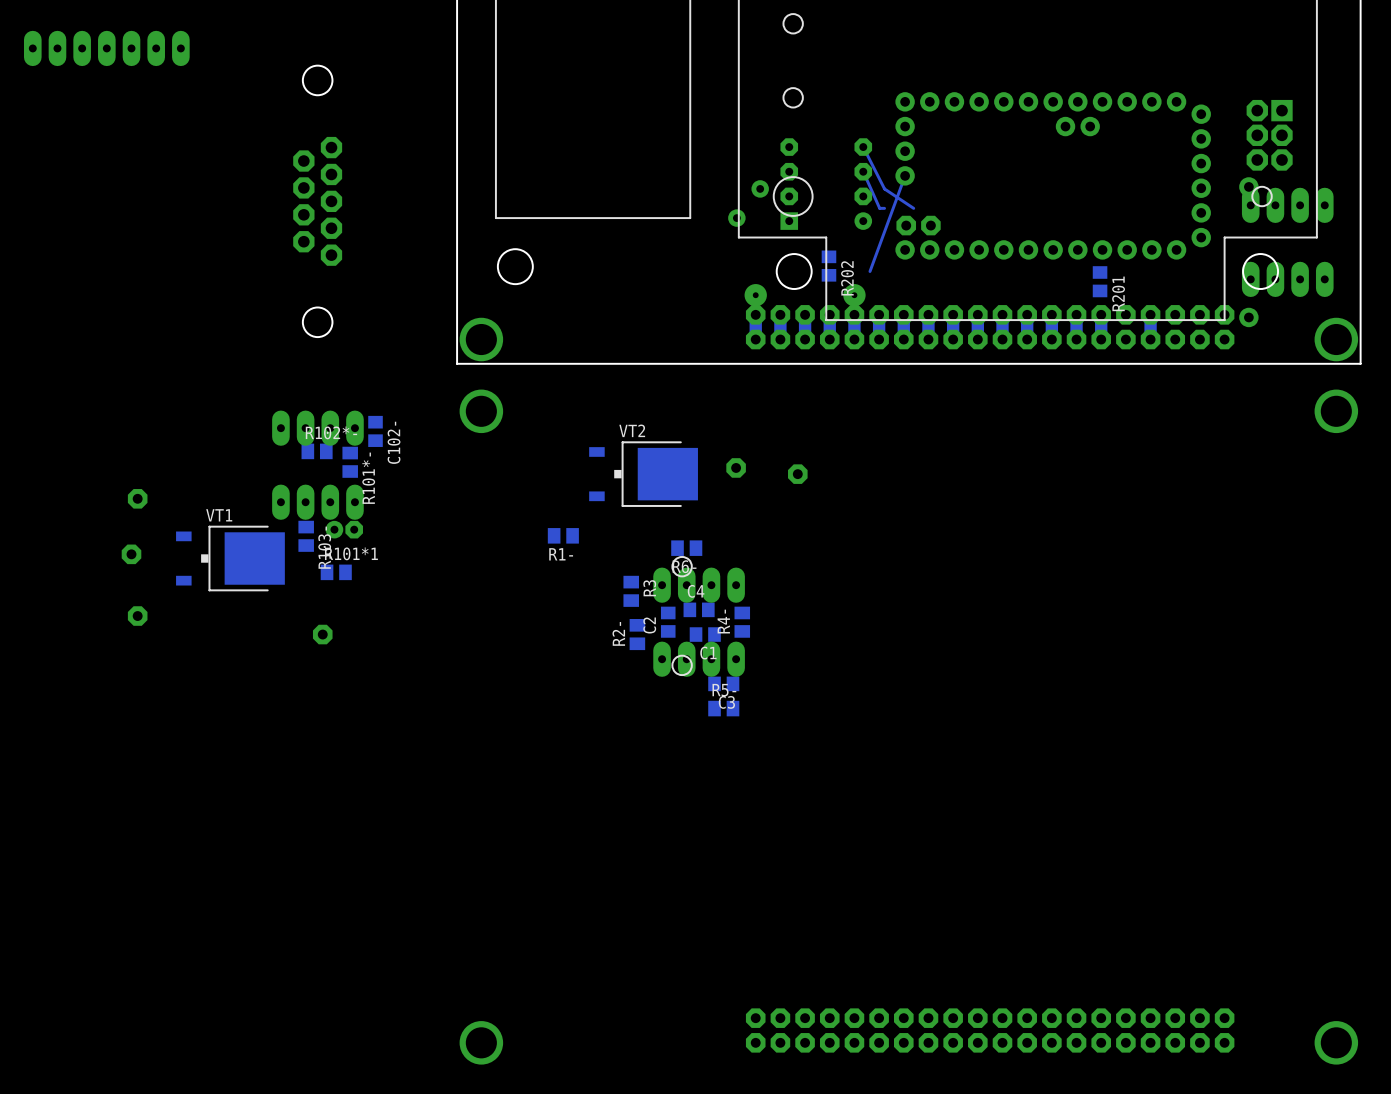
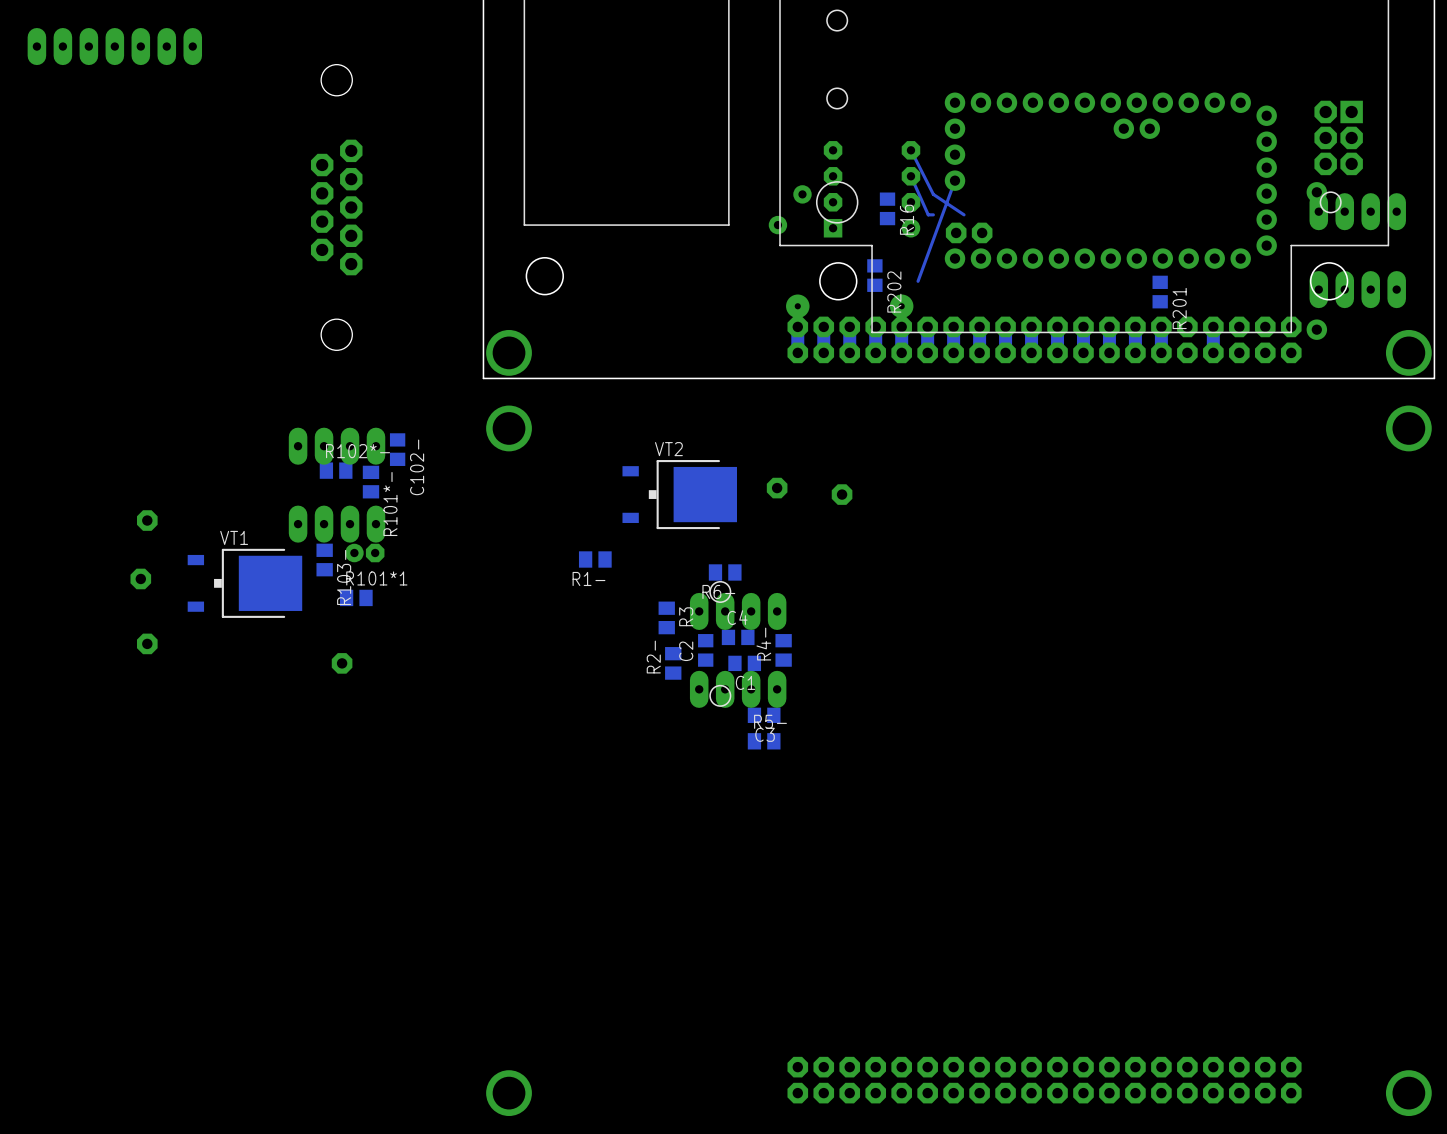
R16: none -> (887, 208)

